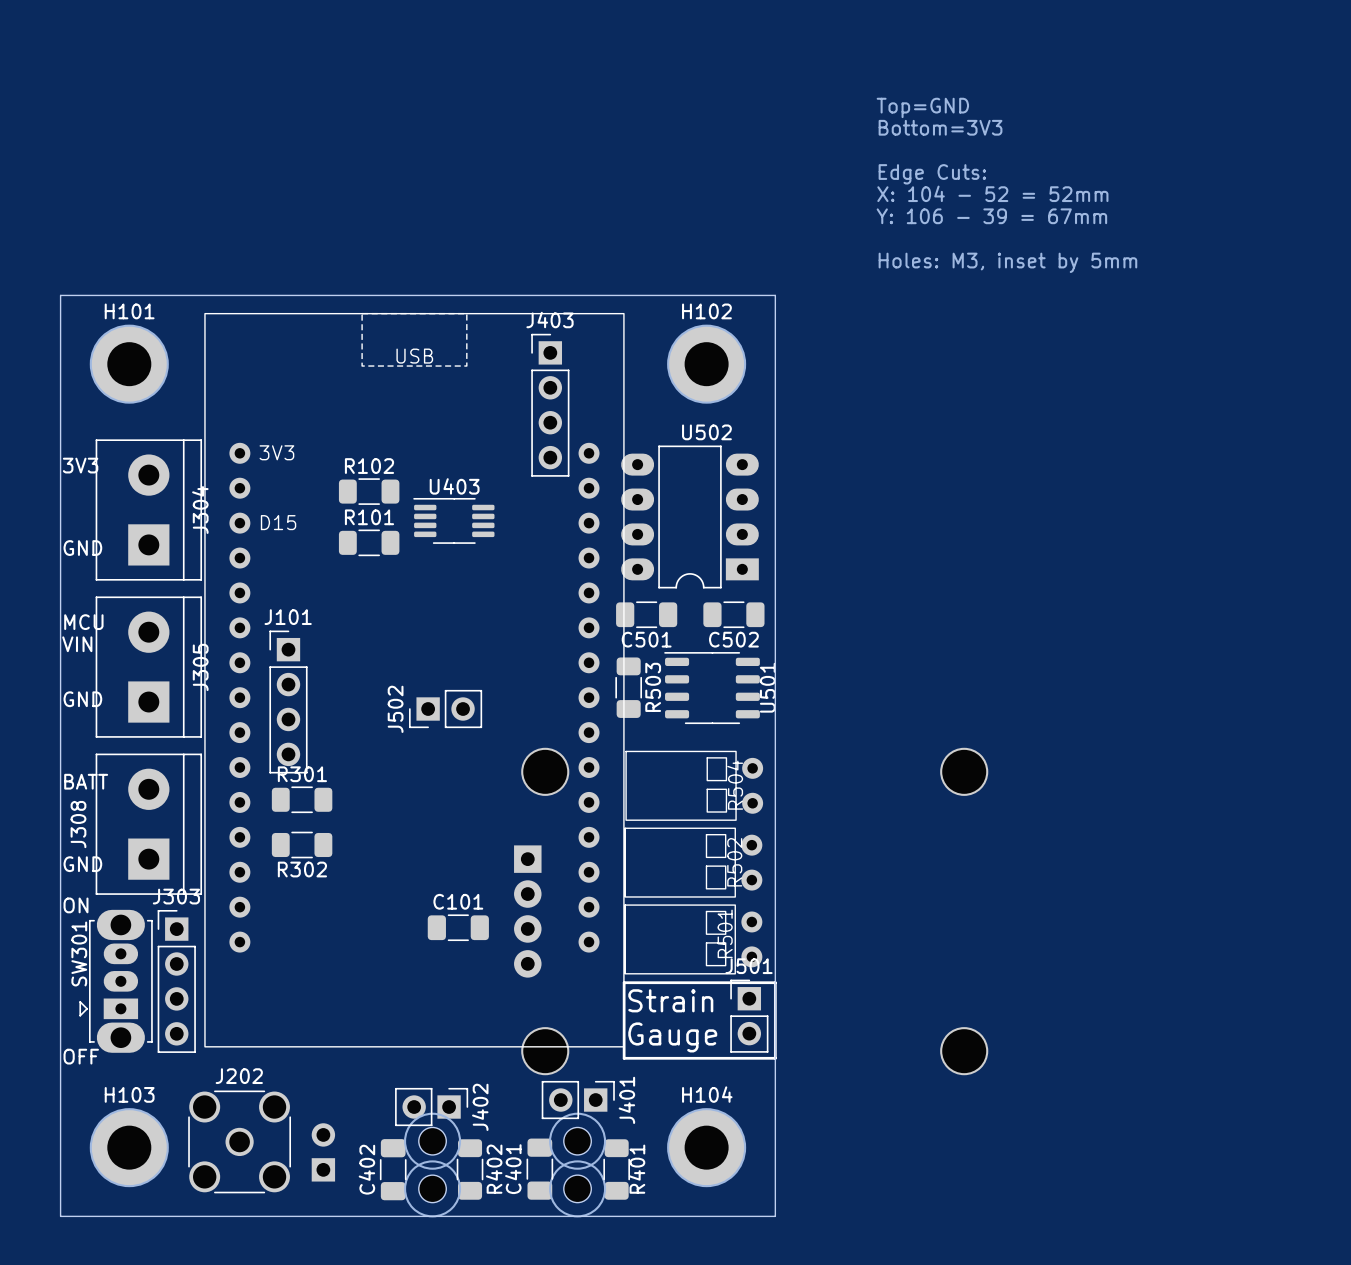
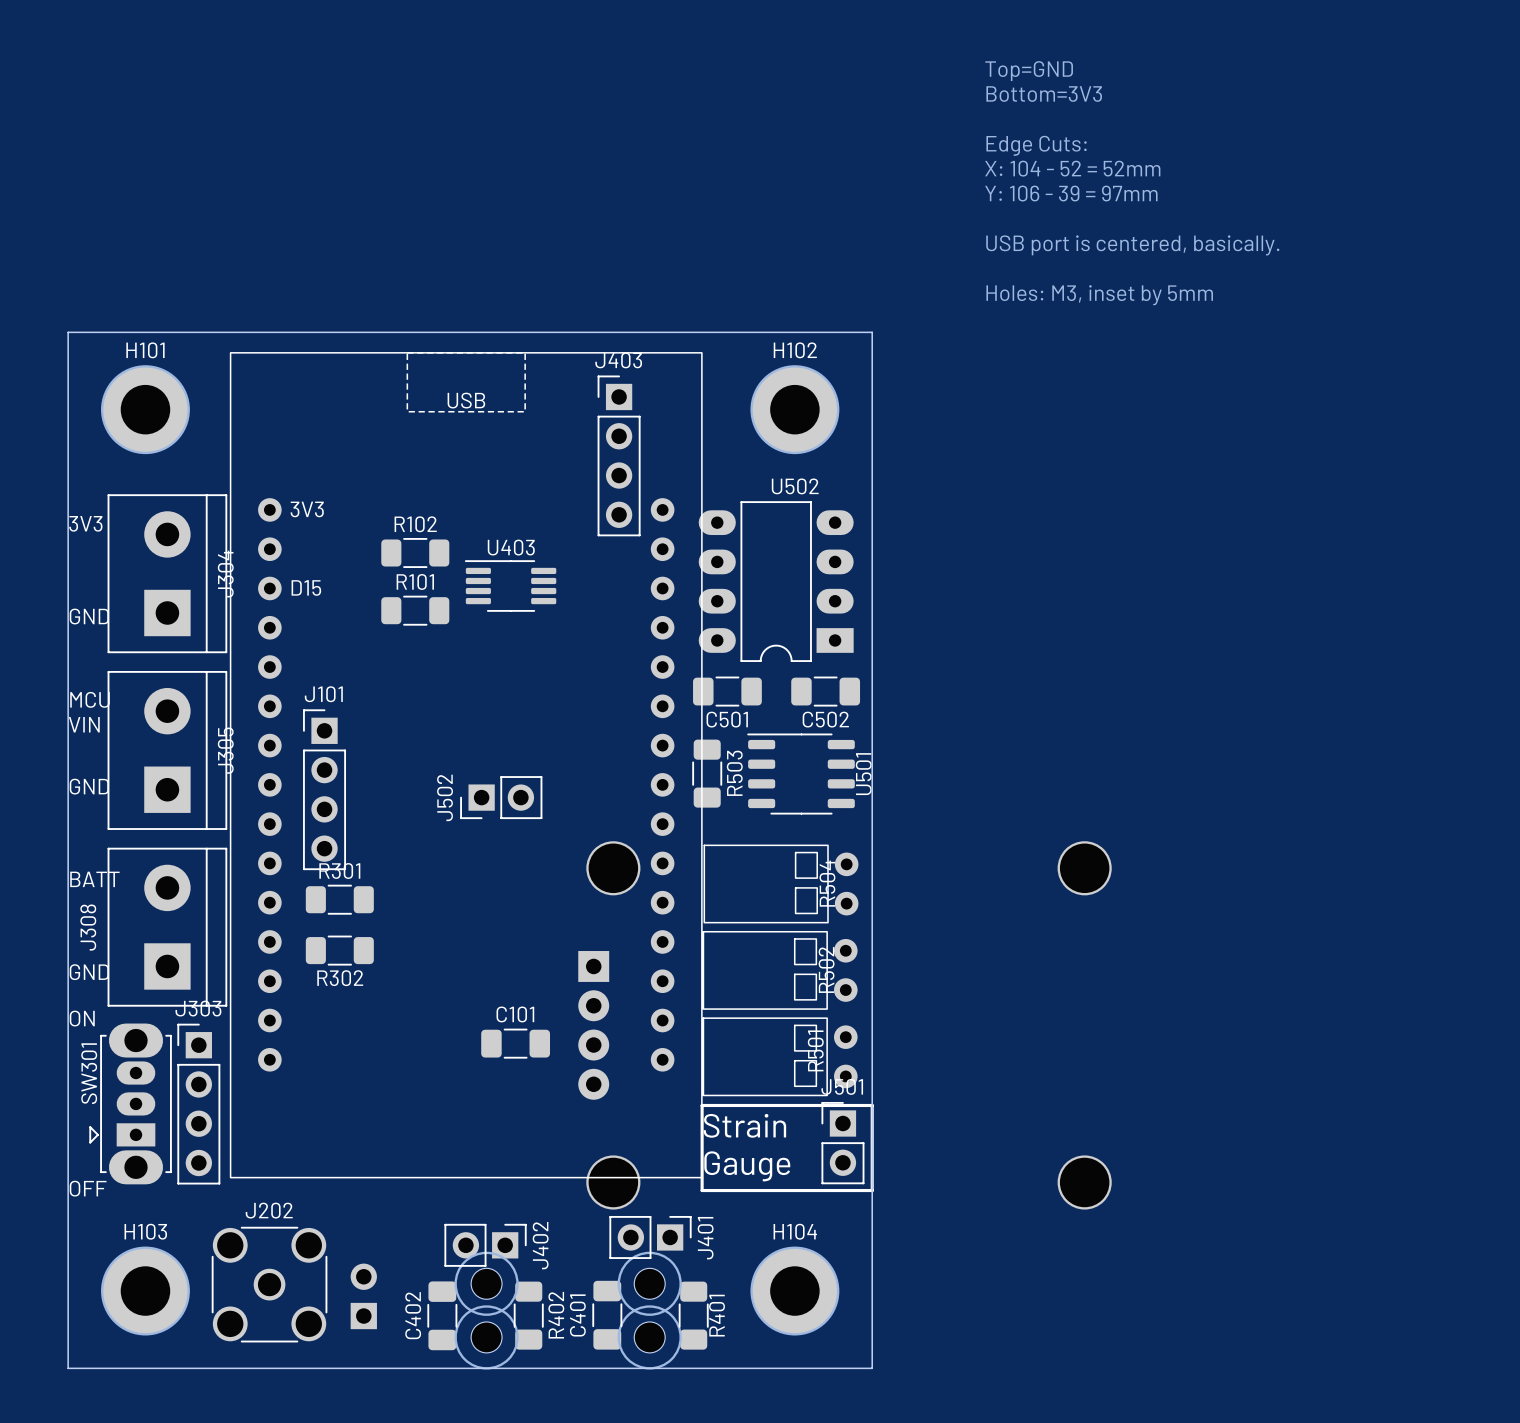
text: none -> Bottom=3V3 (1044, 94)
text position: Top=GND (922, 107) -> Top=GND (1029, 71)
text: Bottom=3V3 (940, 127) -> Edge Cuts: (1036, 145)
text: Edge Cuts: (932, 174) -> Y: 106 - 39 = 97mm (1071, 193)
text position: X: 104 - 52 = 52mm (992, 193) -> X: 104 - 52 = 52mm (1072, 168)
text: Y: 106 - 39 = 67mm (991, 216) -> USB port is centered, basically. (1132, 245)

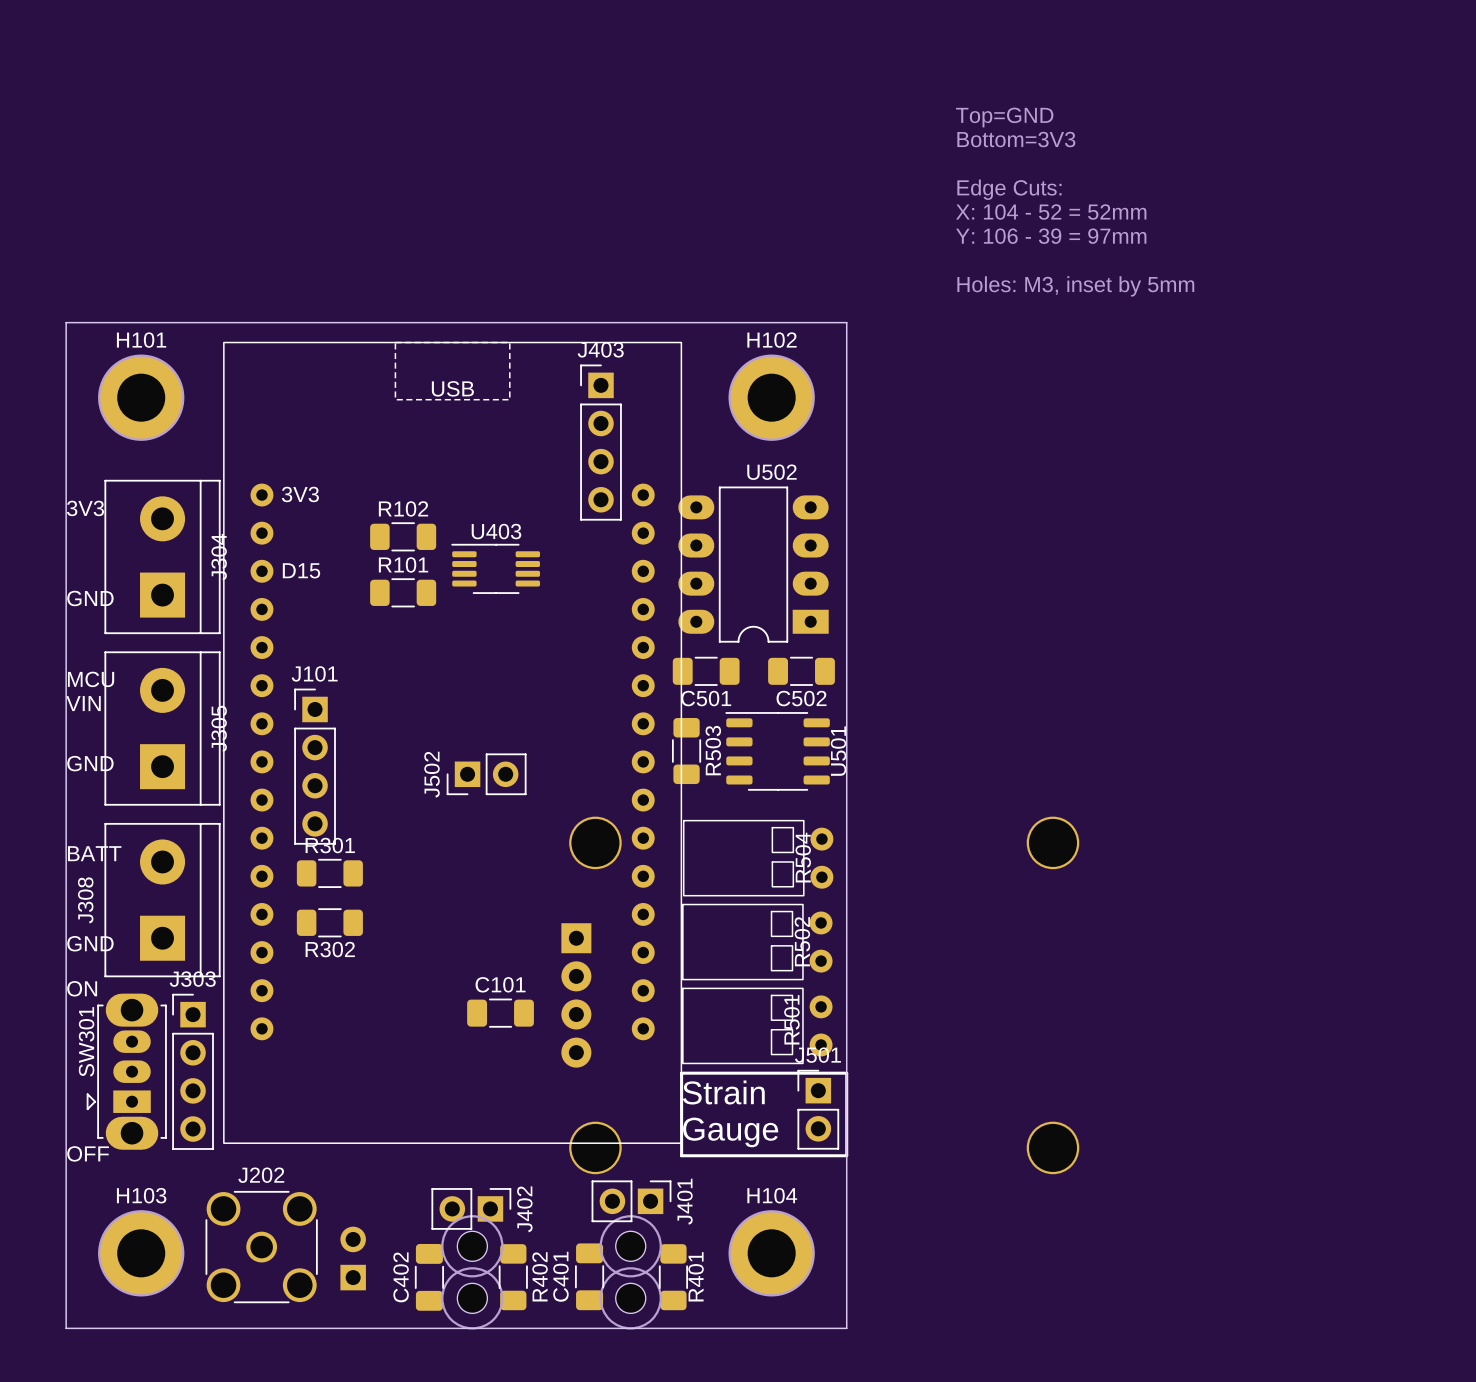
text position: Top=GND (1029, 71) -> Top=GND (1004, 117)
text: Bottom=3V3 (1044, 94) -> none
text: Edge Cuts: (1036, 145) -> Bottom=3V3 (1016, 139)
text position: X: 104 - 52 = 52mm (1072, 168) -> X: 104 - 52 = 52mm (1051, 212)
text: Y: 106 - 39 = 97mm (1071, 193) -> Edge Cuts: (1009, 189)
text: USB port is centered, basically. (1132, 245) -> Y: 106 - 39 = 97mm (1051, 236)

